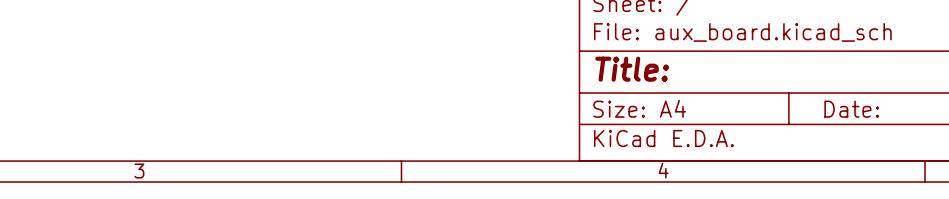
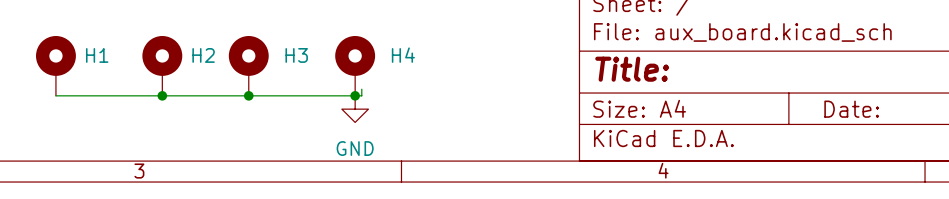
H1: none -> (55, 65)
H2: none -> (162, 65)
H3: none -> (248, 65)
H4: none -> (355, 65)
wire: none -> (361, 89) (361, 95) (55, 95)
junction: none -> (162, 95)
junction: none -> (248, 95)
junction: none -> (355, 95)
power symbol: none -> GND (355, 109)

